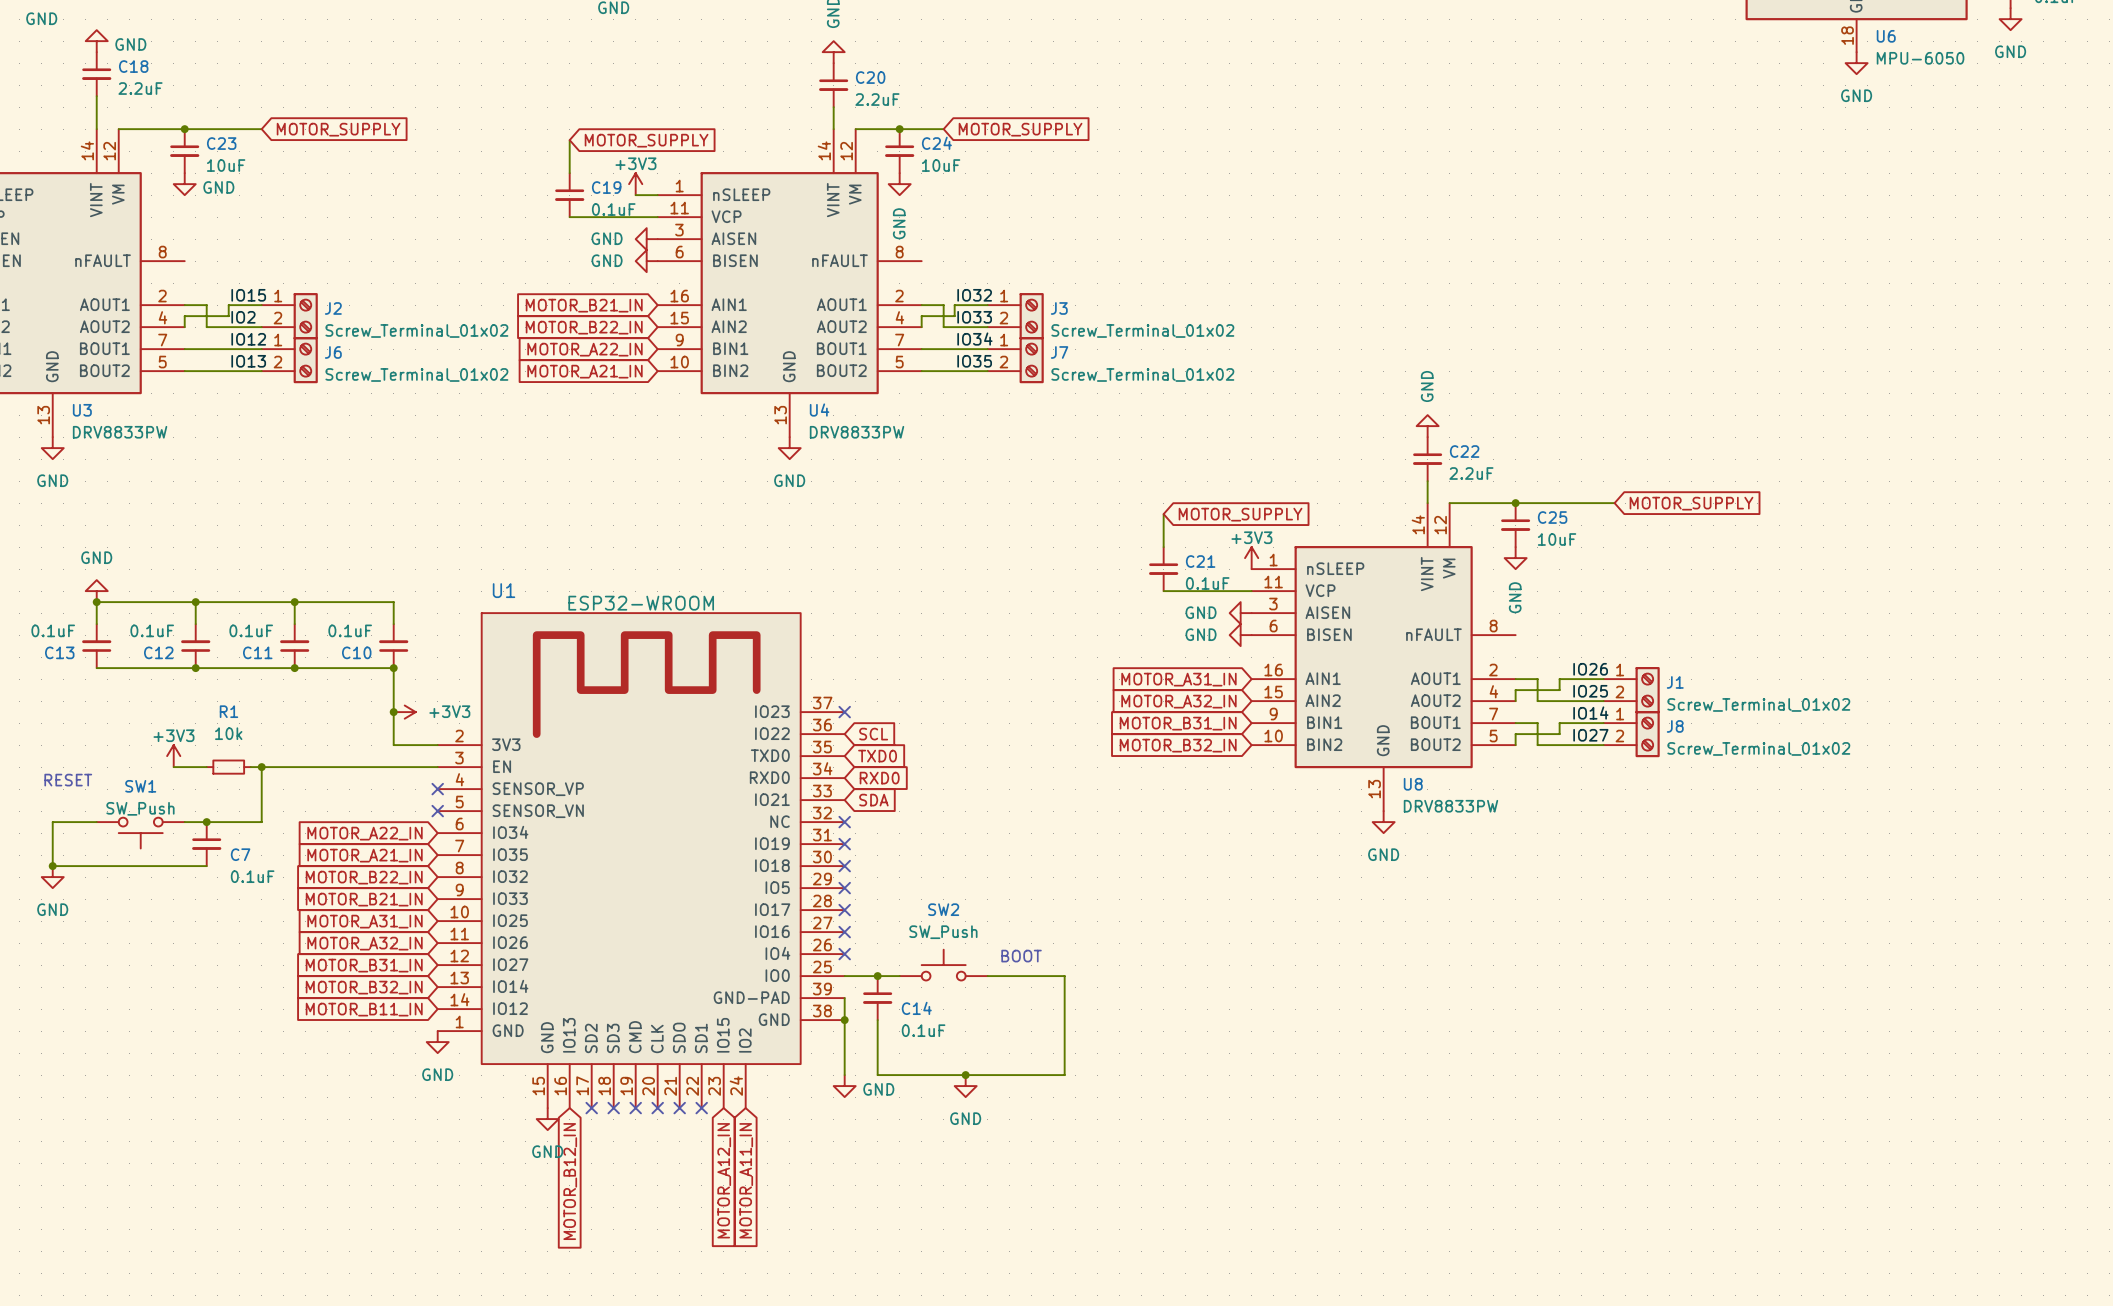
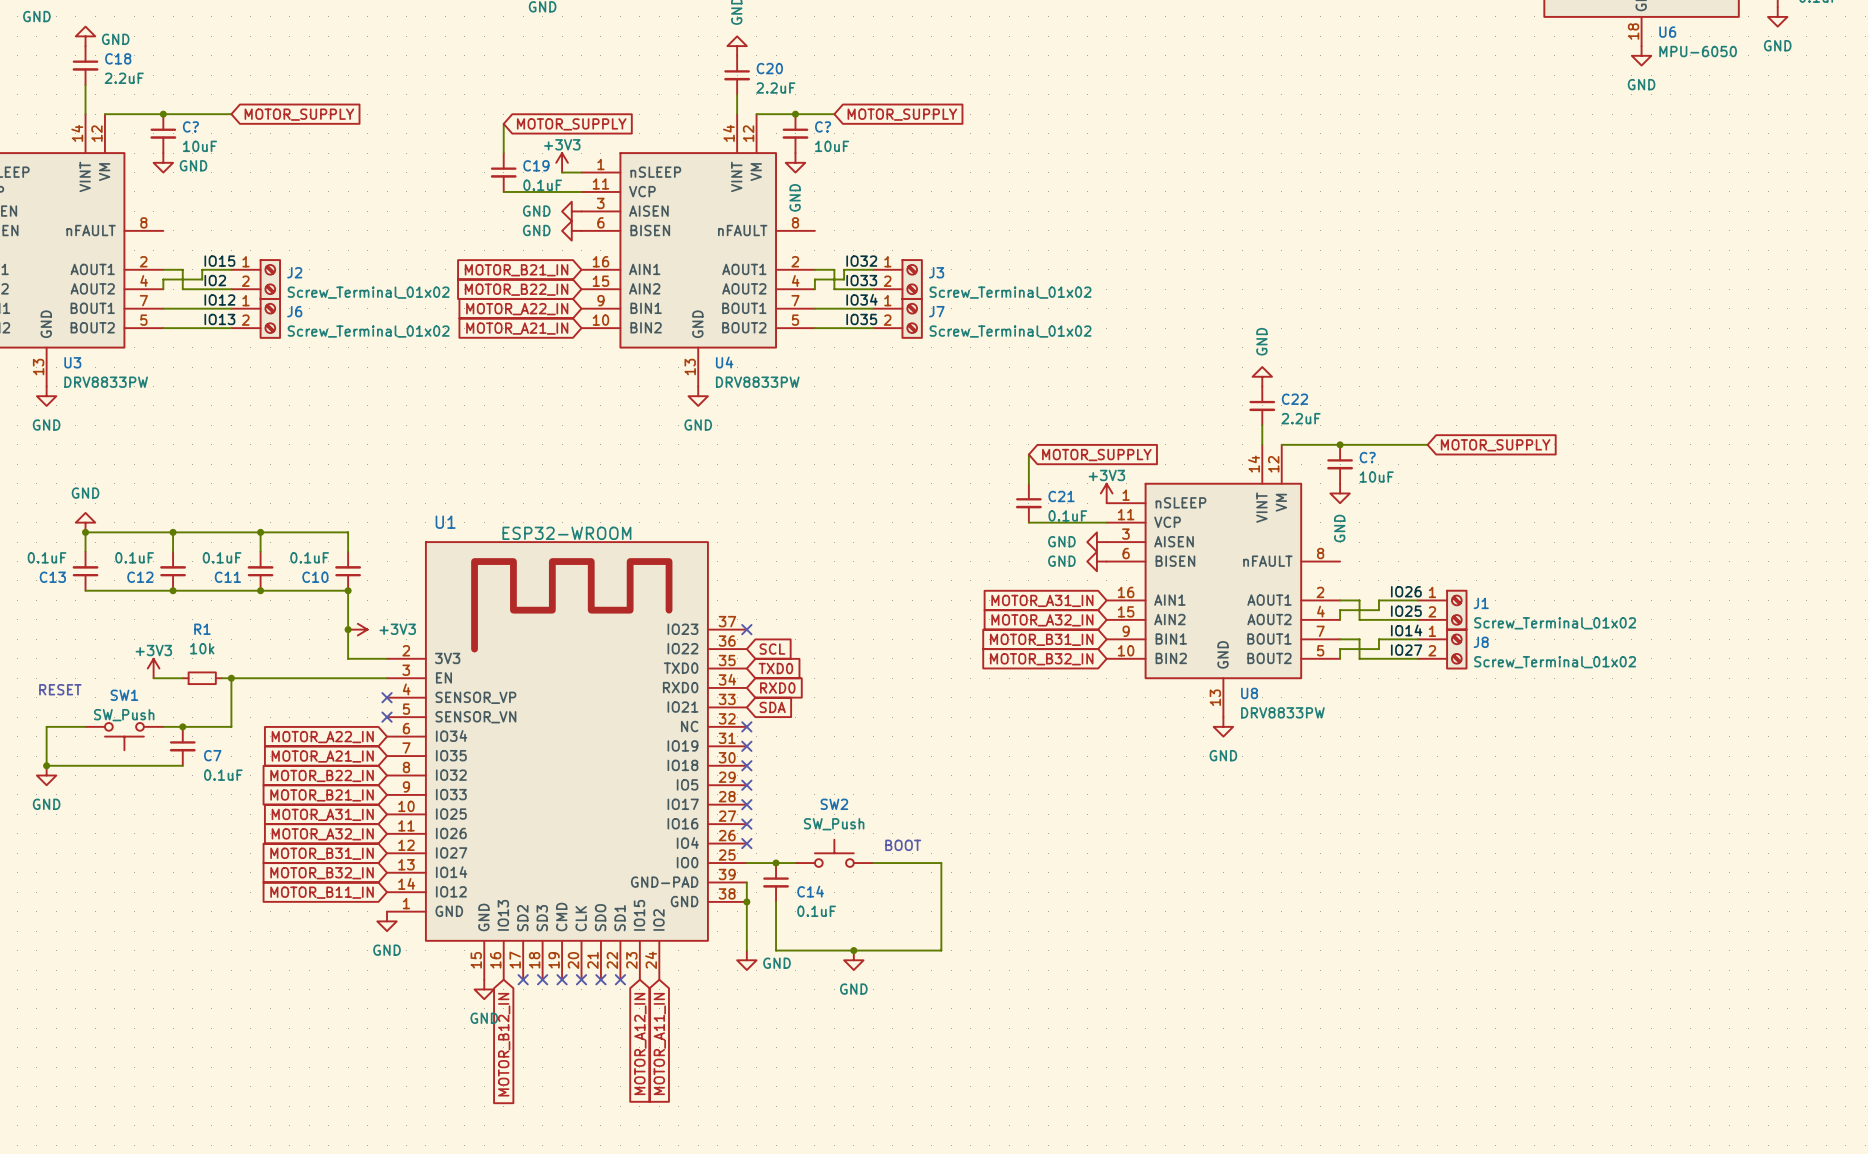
C23 name: C23 (221, 143) -> C? (190, 126)
C24 name: C24 (936, 143) -> C? (823, 126)
C25 name: C25 (1552, 517) -> C? (1367, 457)

